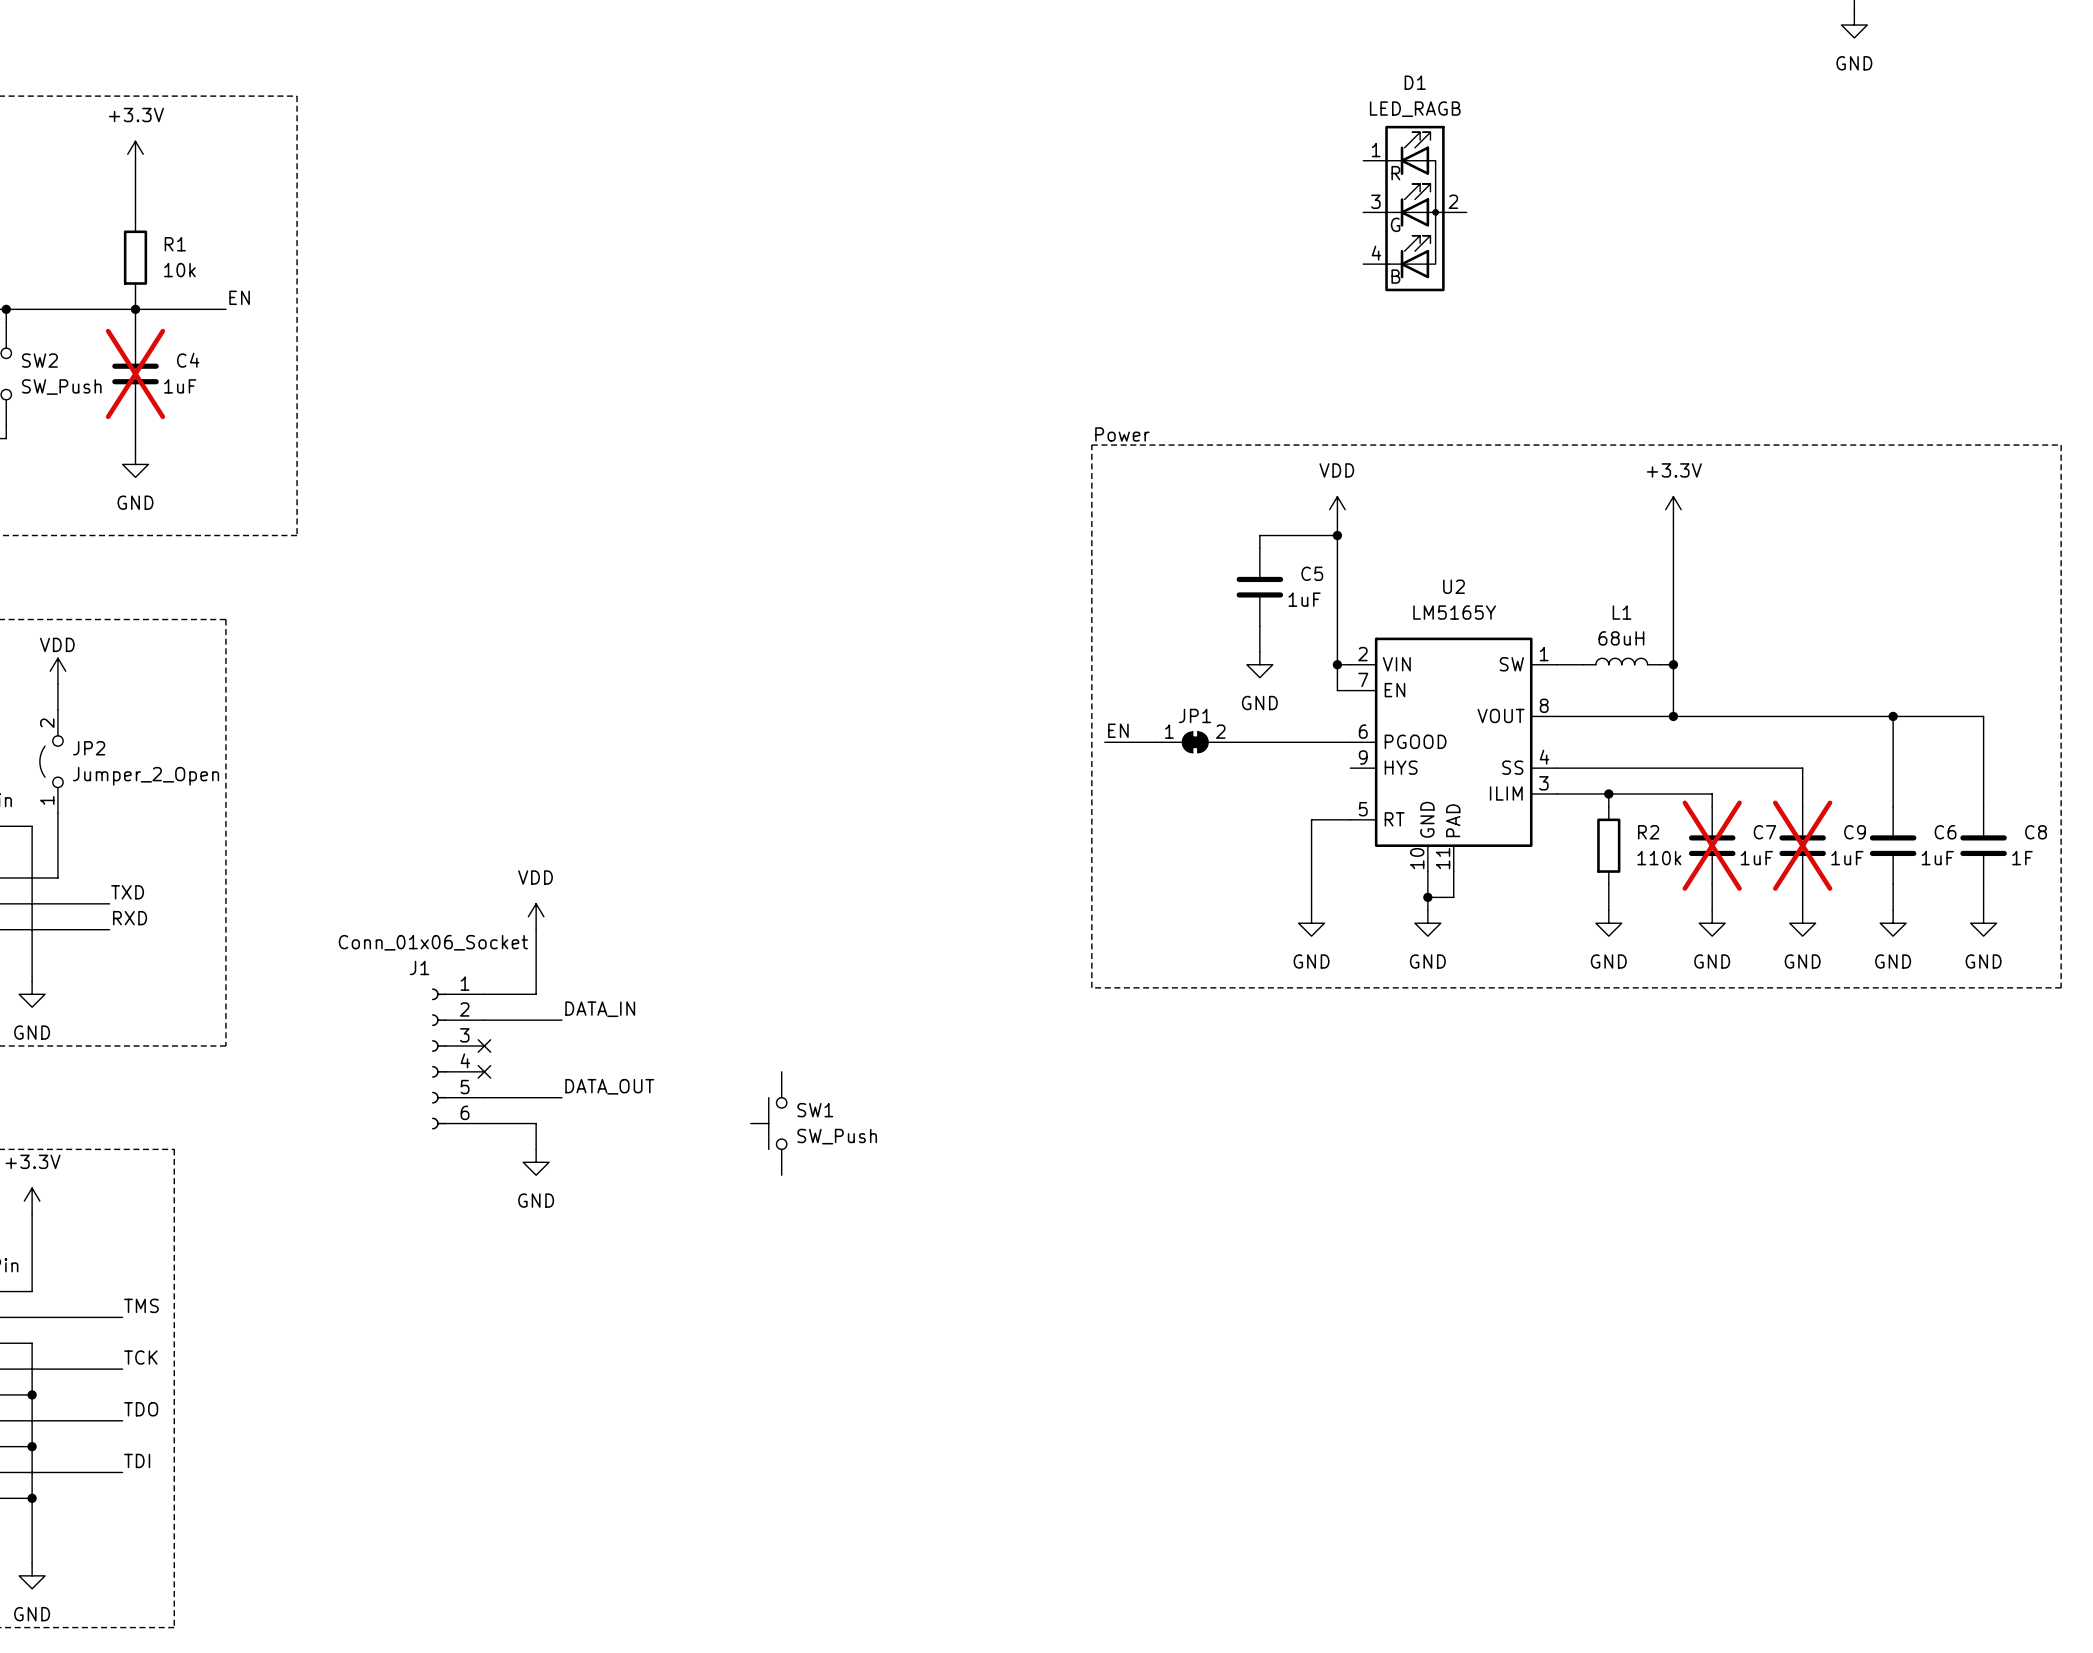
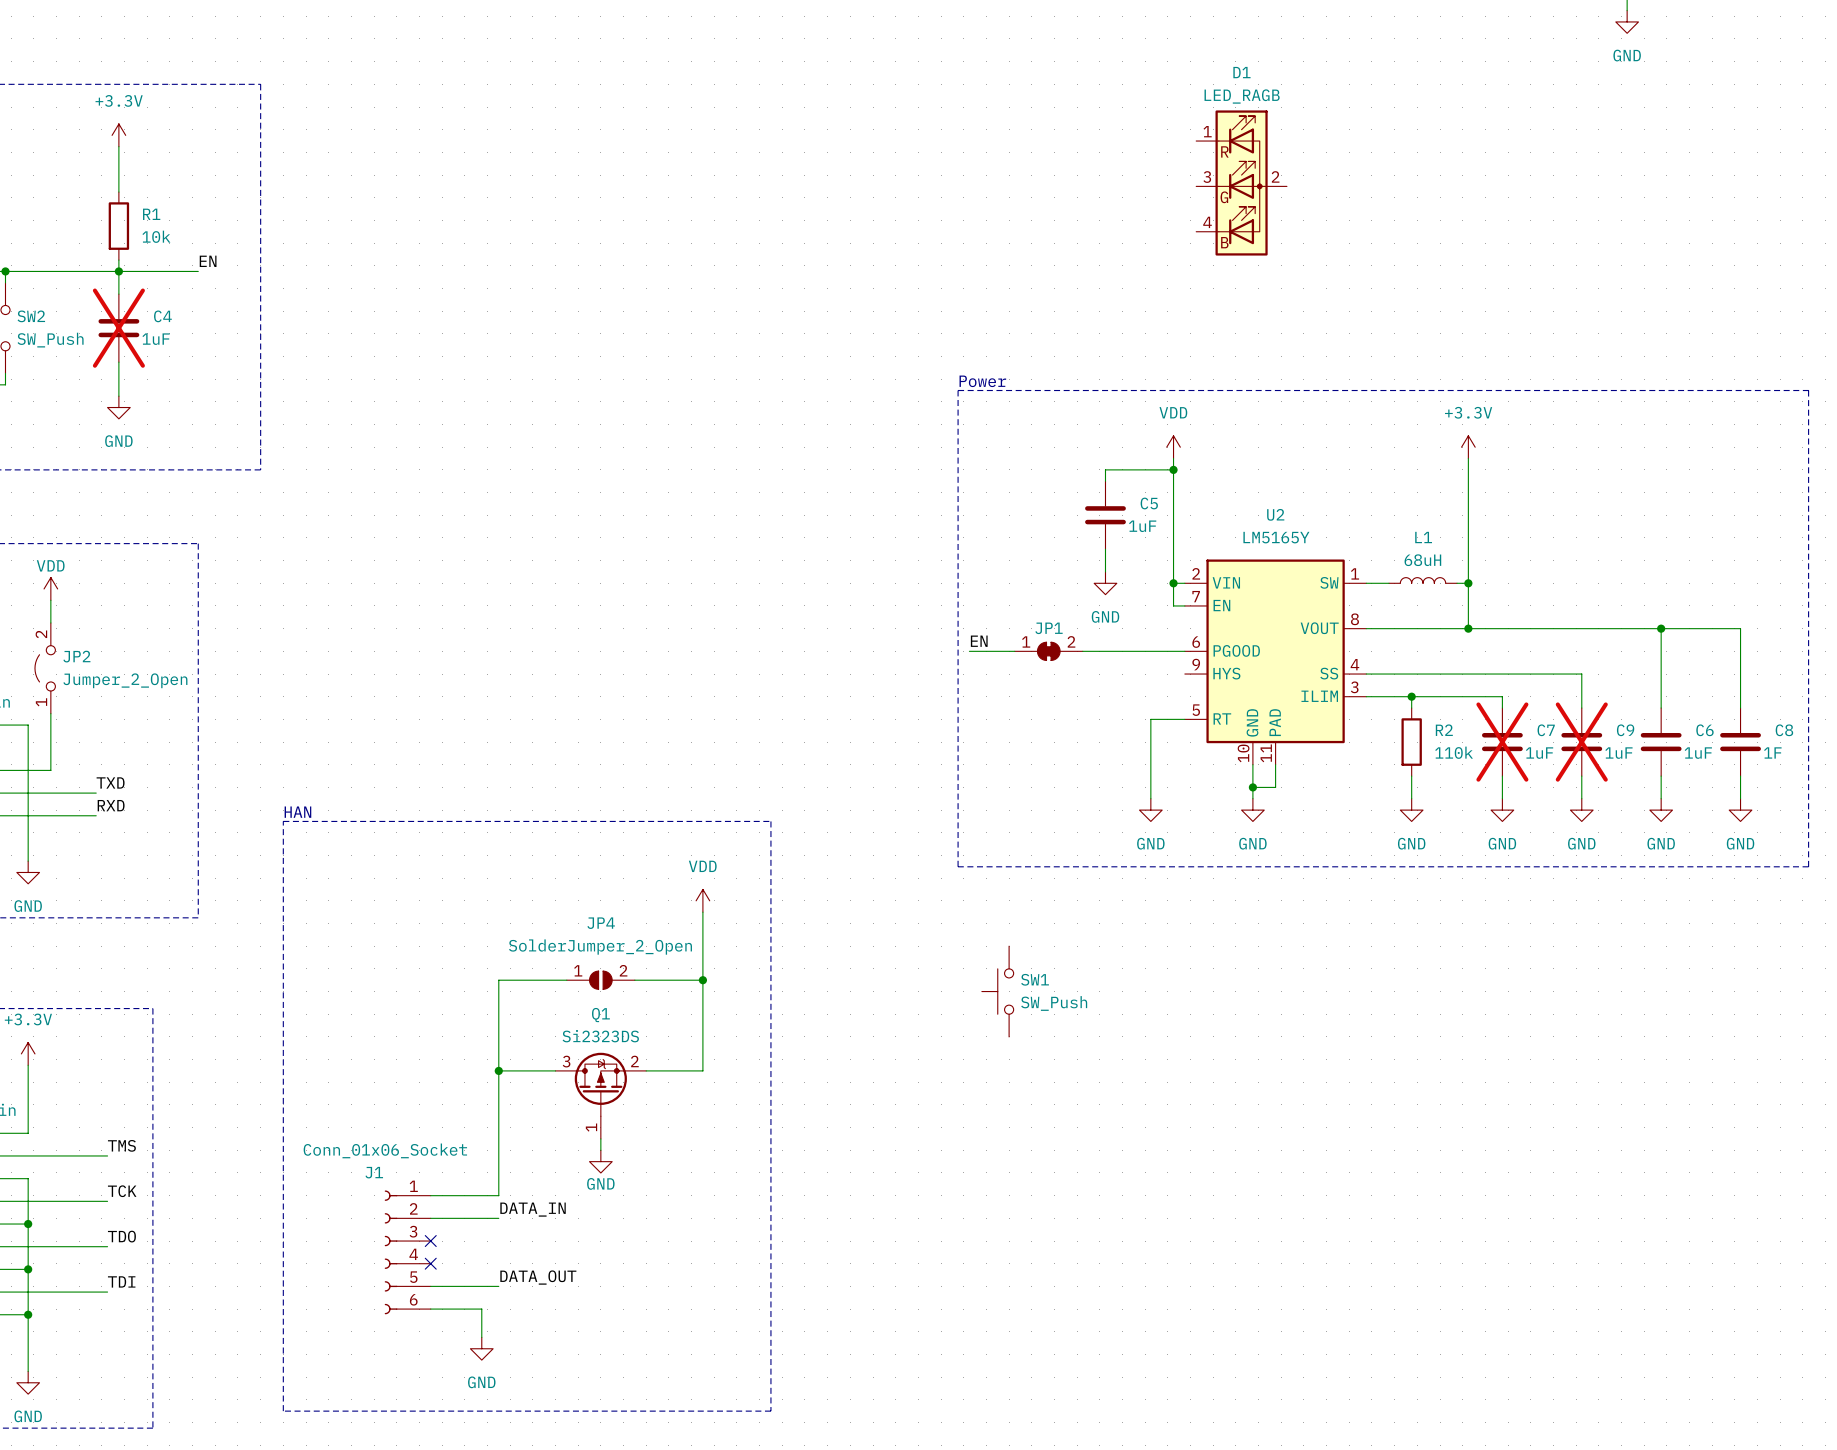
power symbol: VDD (536, 916) -> none
text: none -> HAN (297, 812)
wire: (536, 929) (536, 994) (484, 994) -> none
line: none -> (283, 821) (770, 821) (770, 1411) (283, 1411) (283, 821)
label: DATA_IN (600, 1009) -> none
wire: (484, 1020) (561, 1020) -> none
power symbol: none -> VDD (702, 900)
wire: none -> (702, 912) (702, 1070) (646, 1070)
no-connect mark: (484, 1046) -> none
J1 position: (458, 1058) -> (407, 1252)
no-connect mark: (484, 1071) -> none
label: DATA_OUT (609, 1086) -> none
wire: (484, 1097) (561, 1097) -> (634, 980) (702, 980)
wire: none -> (566, 980) (498, 980) (498, 1195) (430, 1195)
JP4: none -> SolderJumper_2_Open (600, 980)
junction: none -> (702, 980)
wire: (484, 1123) (536, 1123) (536, 1149) -> none
SW1 position: (768, 1123) -> (997, 991)
power symbol: GND (536, 1162) -> none
wire: none -> (498, 1070) (555, 1070)
junction: none -> (498, 1070)
Q1: none -> Si2323DS (600, 1095)
wire: none -> (600, 1138) (600, 1150)
power symbol: none -> GND (600, 1161)
label: none -> DATA_IN (533, 1209)
wire: none -> (430, 1218) (498, 1218)
no-connect mark: none -> (430, 1241)
no-connect mark: none -> (430, 1263)
label: none -> DATA_OUT (538, 1277)
wire: none -> (430, 1286) (498, 1286)
wire: none -> (430, 1309) (481, 1309) (481, 1337)
power symbol: none -> GND (481, 1348)

